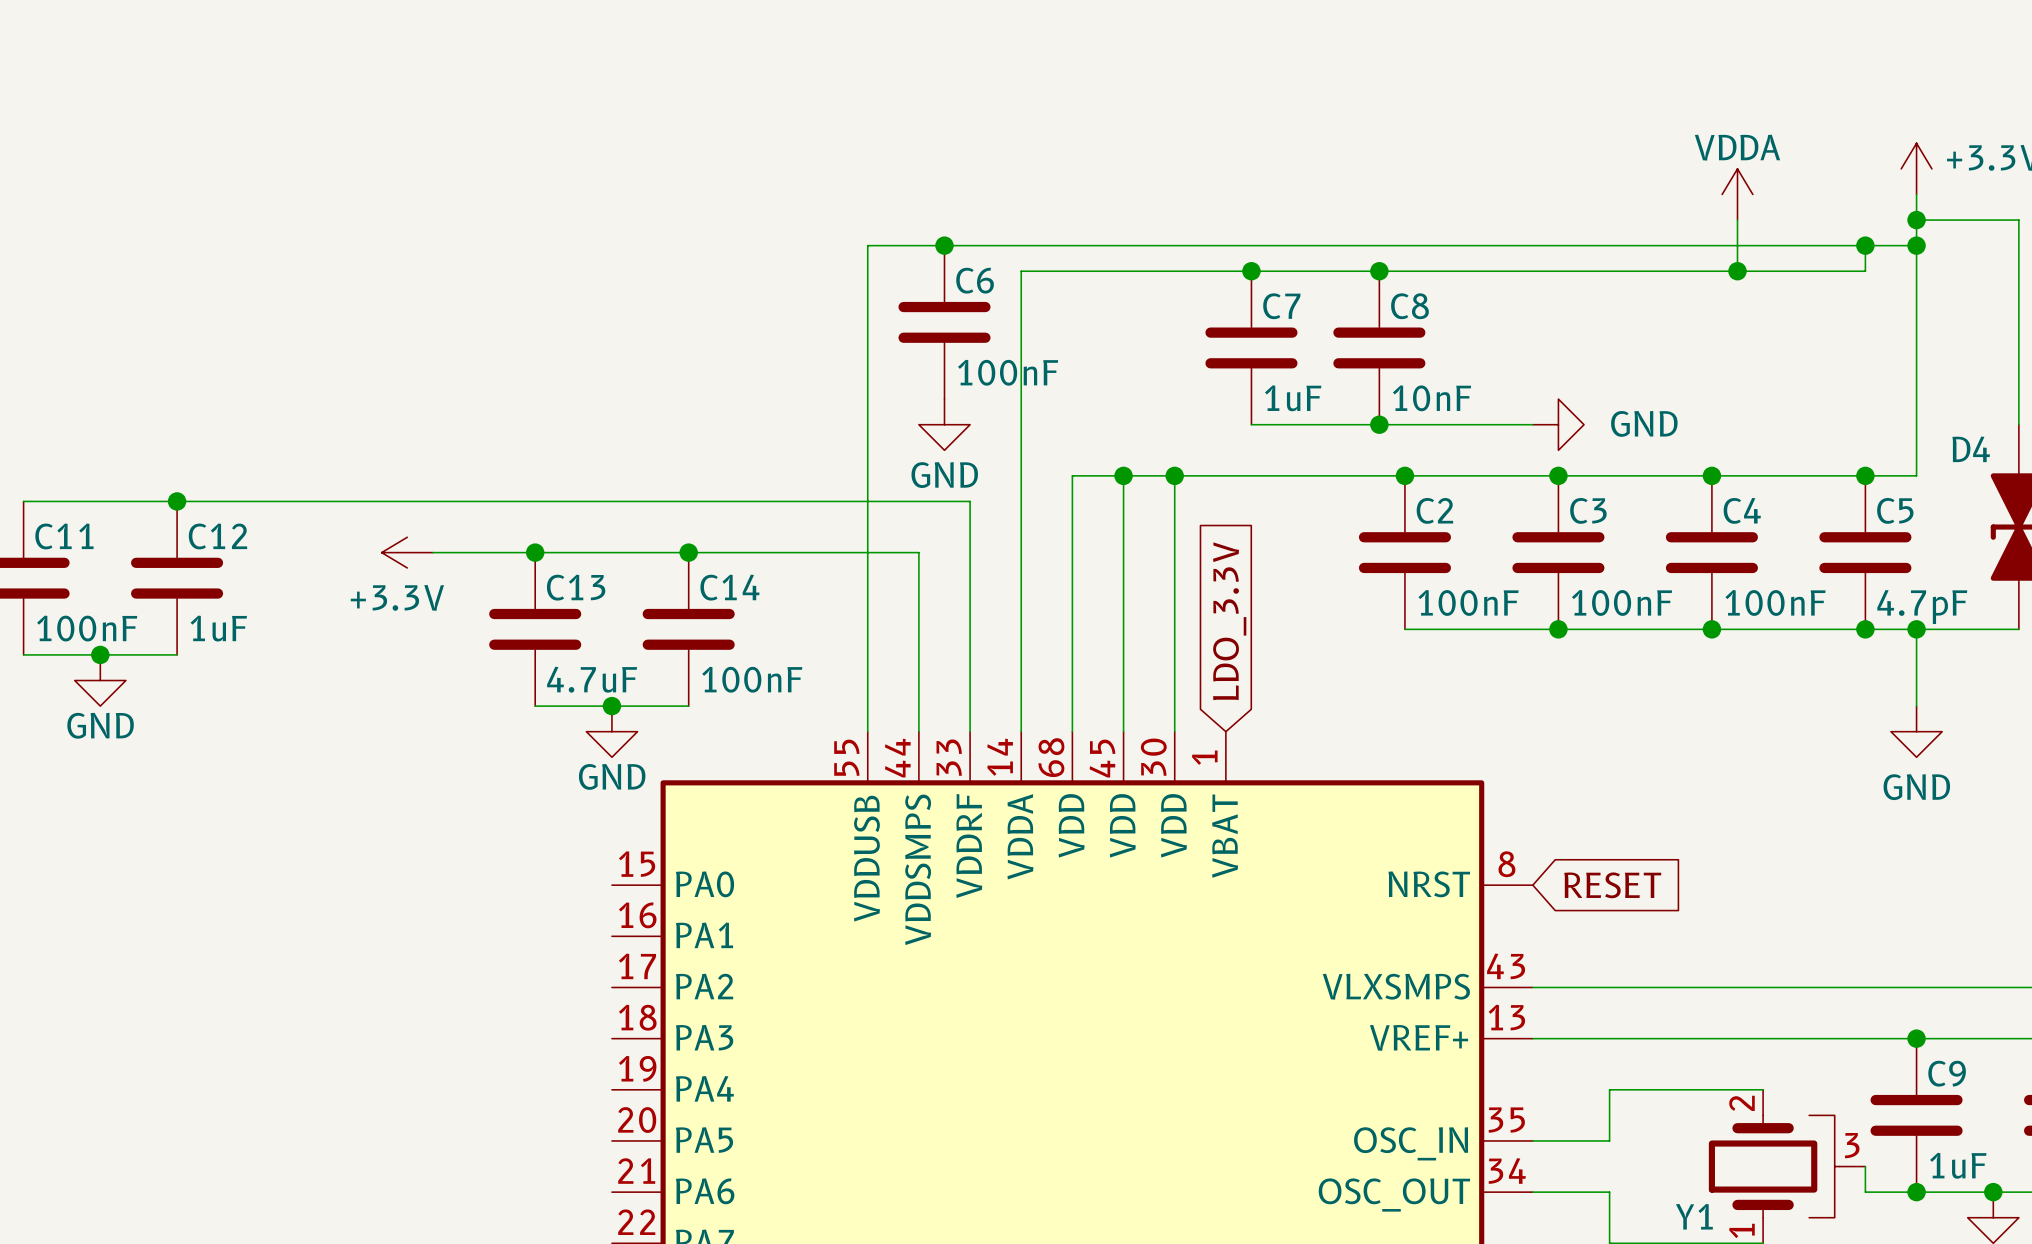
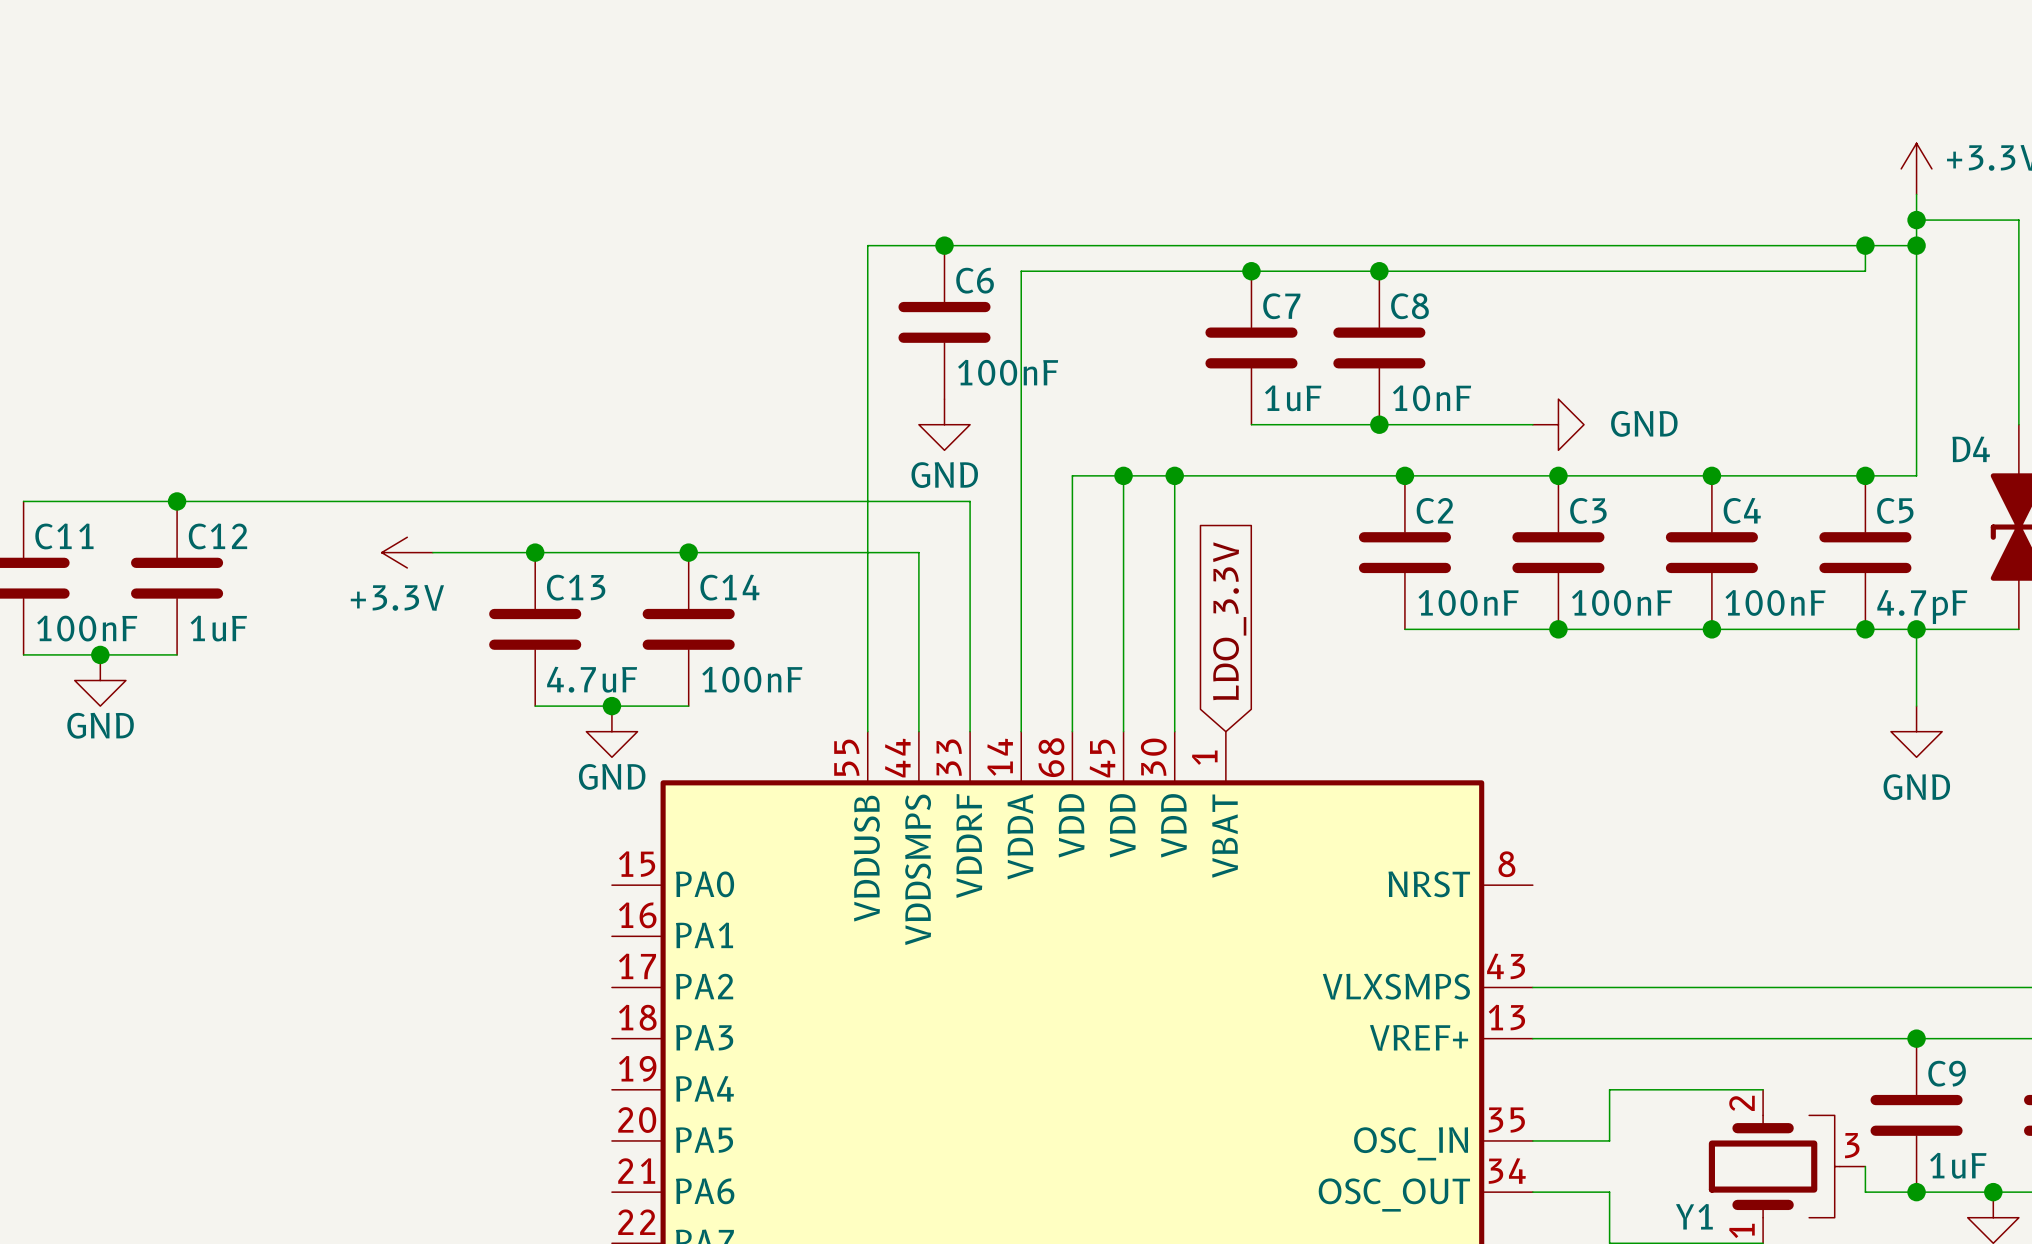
power symbol: VDDA (1737, 194) -> none
wire: (1737, 220) (1737, 271) -> none
junction: (1737, 271) -> none
global label: RESET (1612, 885) -> none

